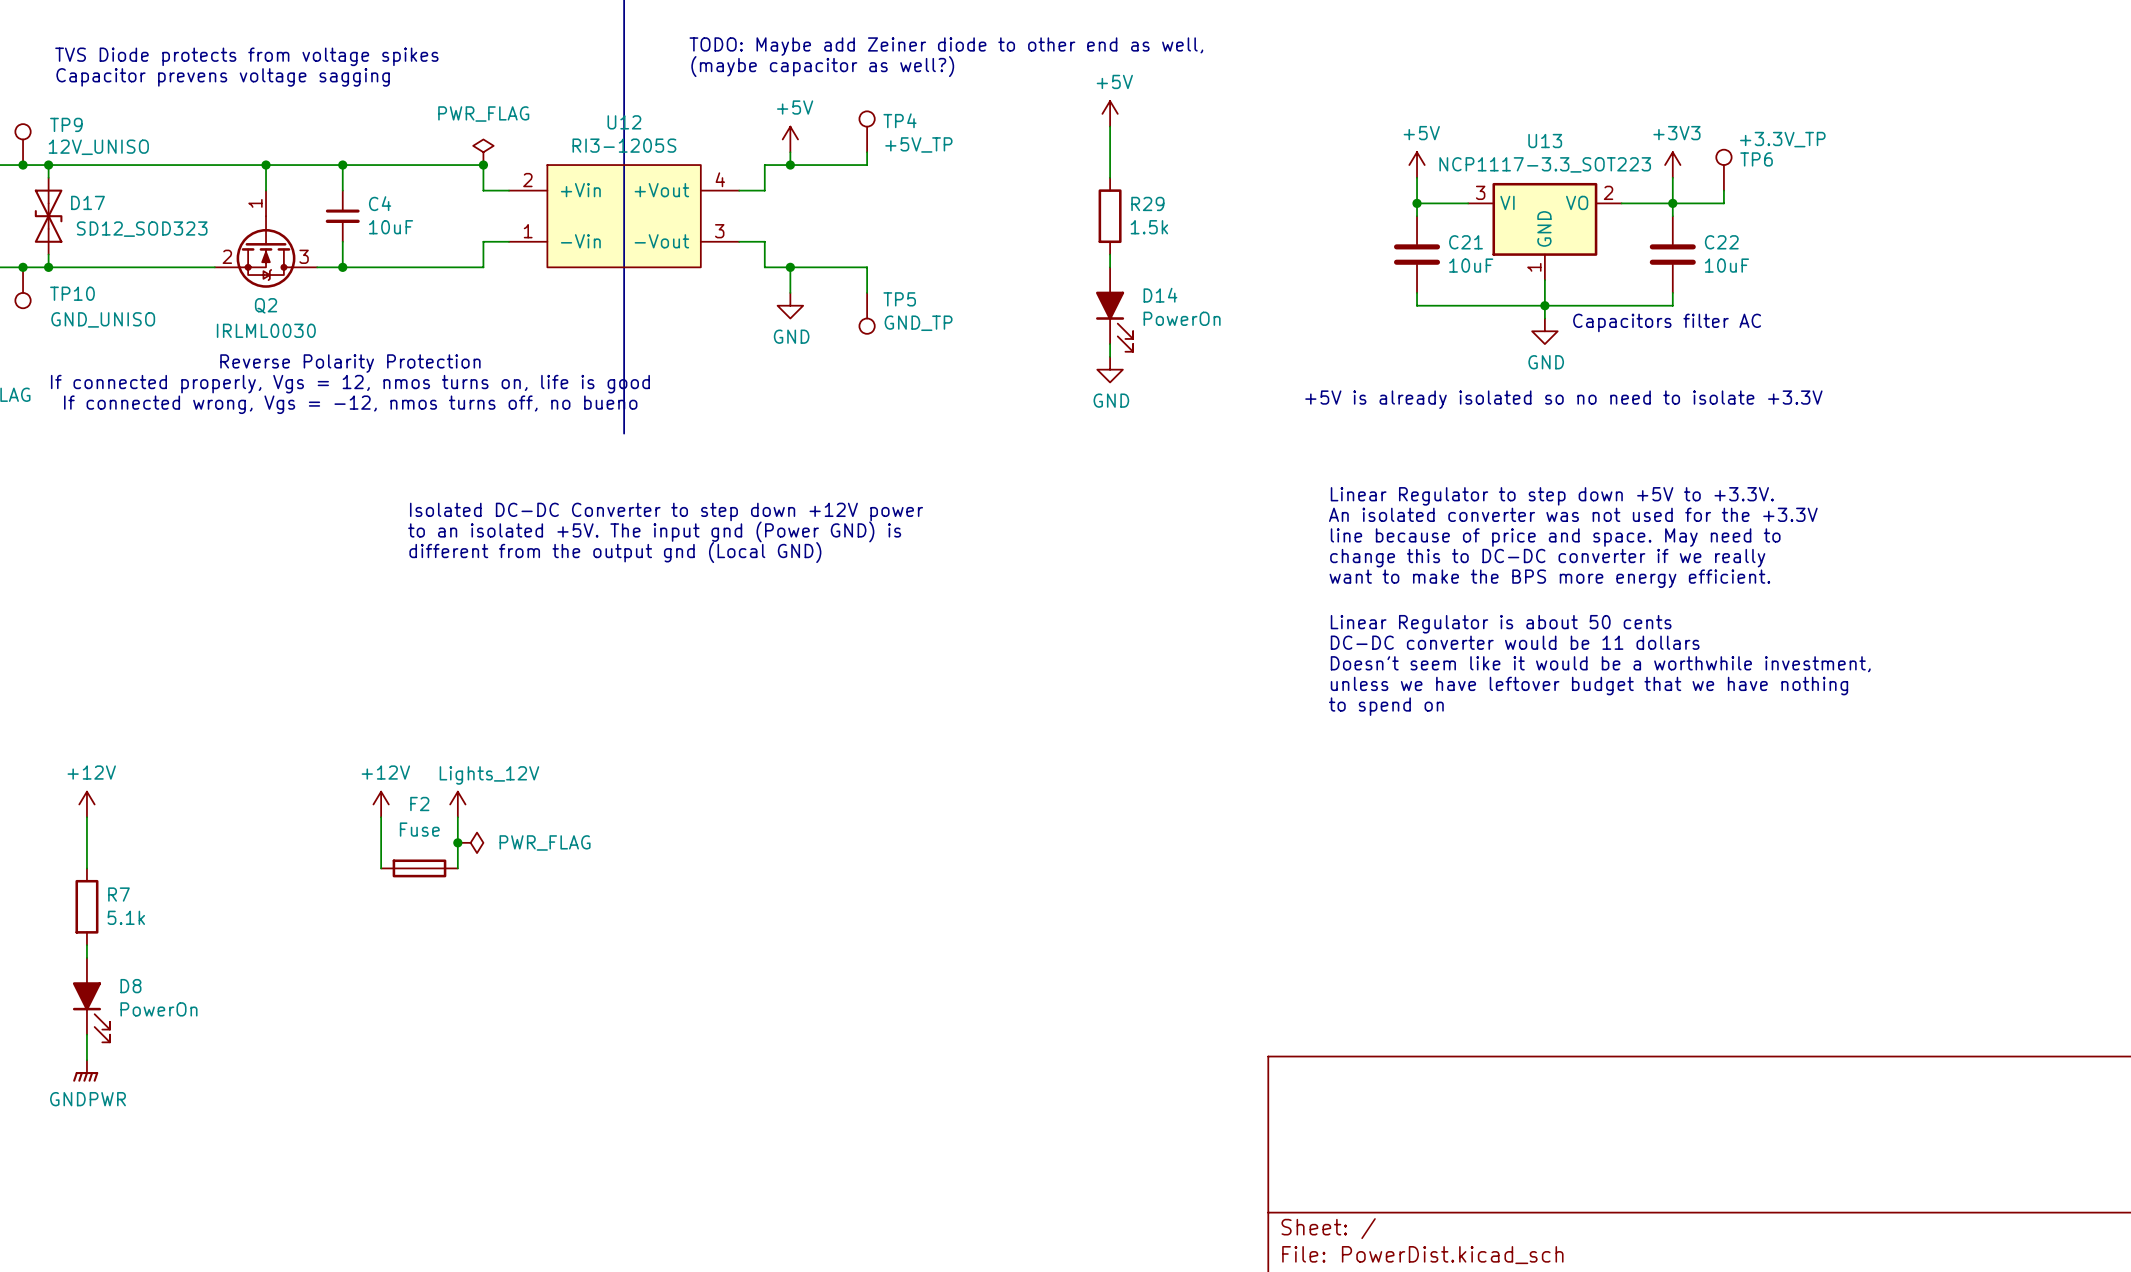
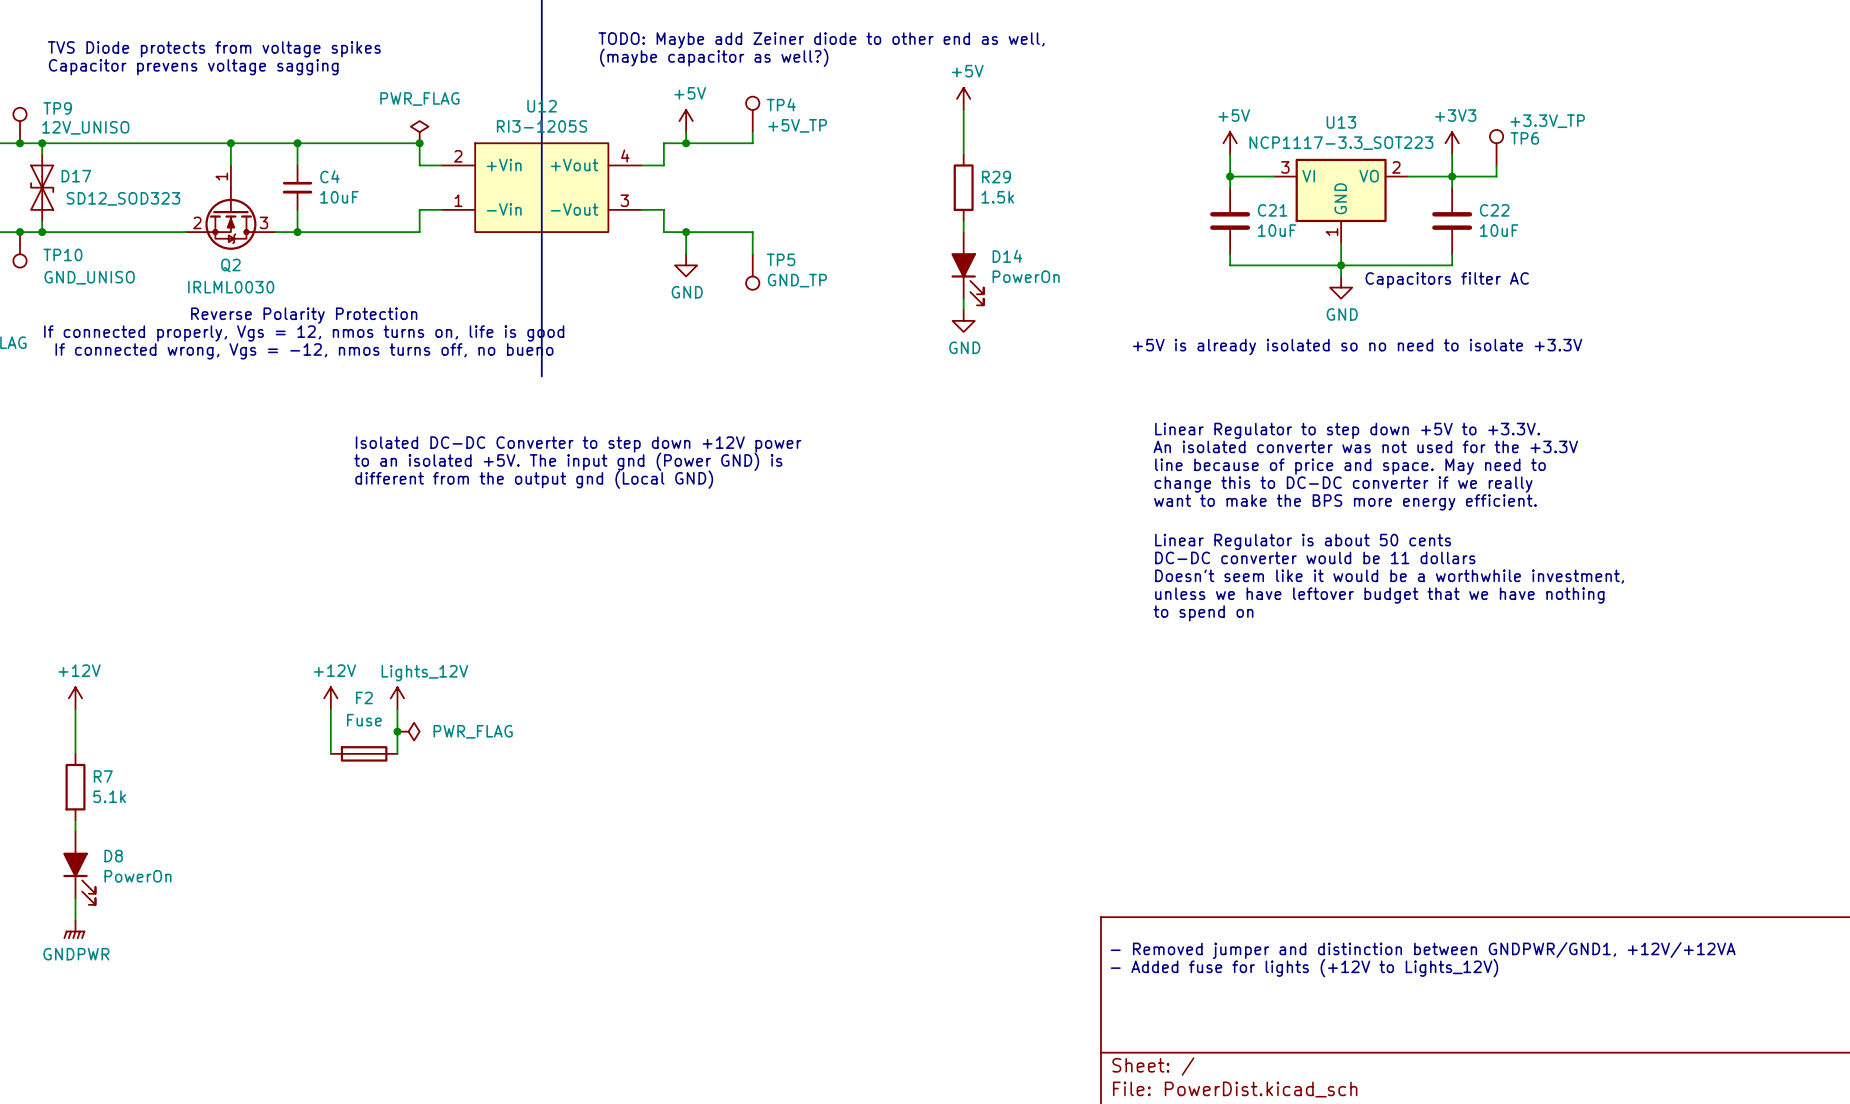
text: none -> - Removed jumper and distinction between GNDPWR/GND1, +12V/+12VA (1423, 950)
text: none -> - Added fuse for lights (+12V to Lights_12V) (1304, 968)

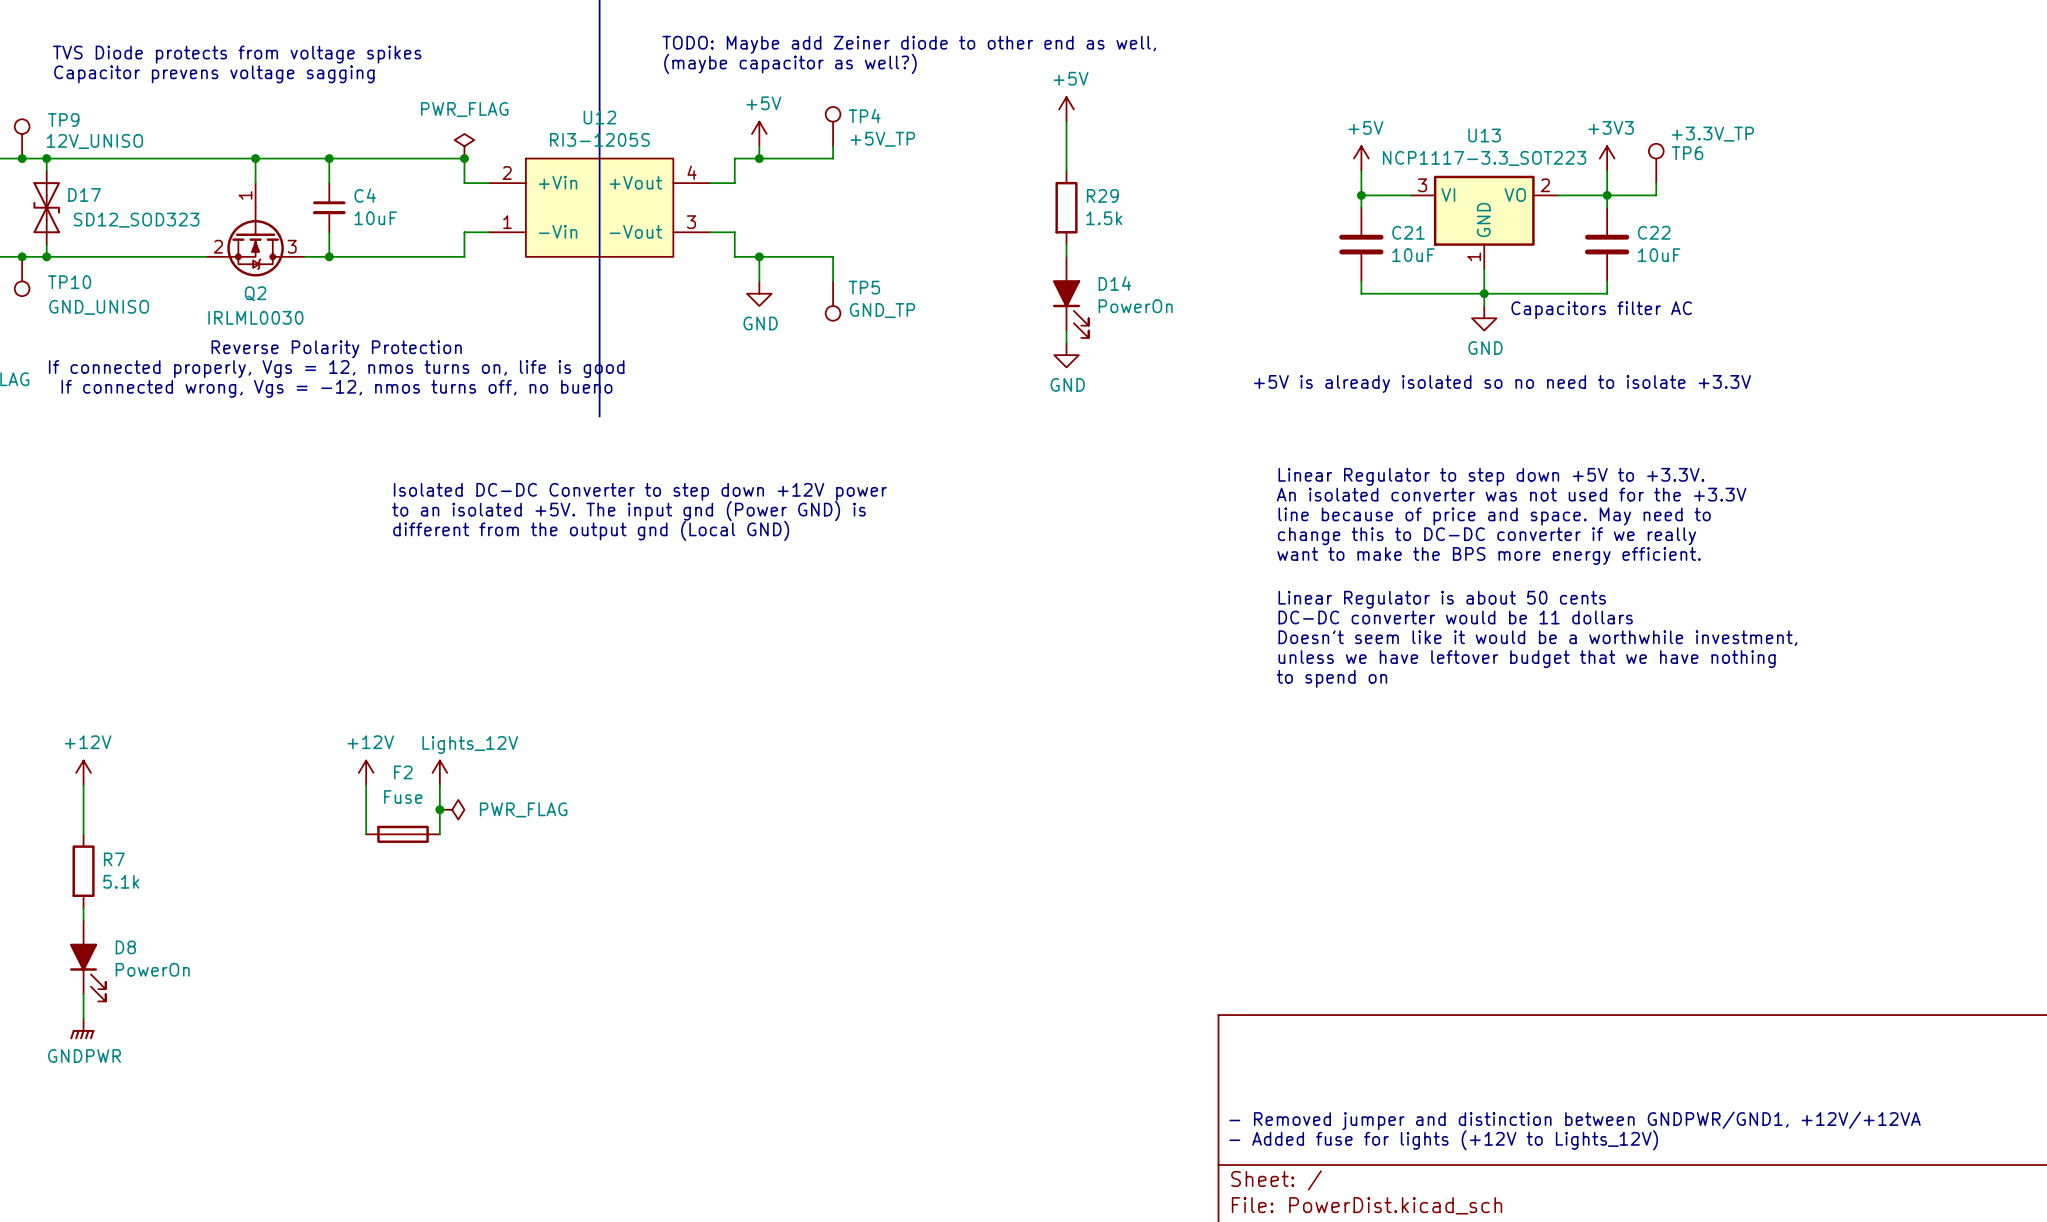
text position: - Removed jumper and distinction between GNDPWR/GND1, +12V/+12VA (1423, 950) -> - Removed jumper and distinction between GNDPWR/GND1, +12V/+12VA (1575, 1120)
text position: - Added fuse for lights (+12V to Lights_12V) (1304, 968) -> - Added fuse for lights (+12V to Lights_12V) (1443, 1140)

